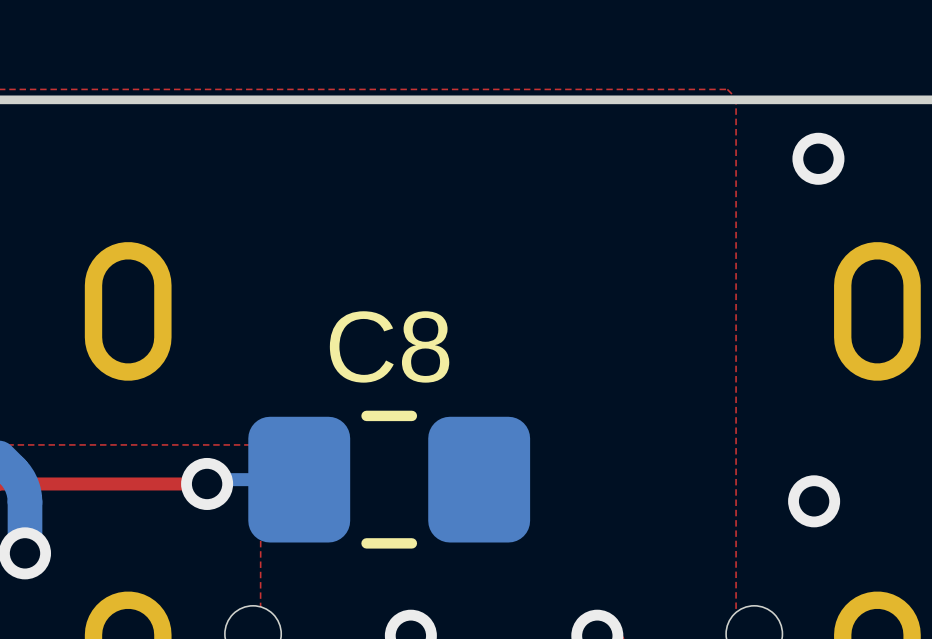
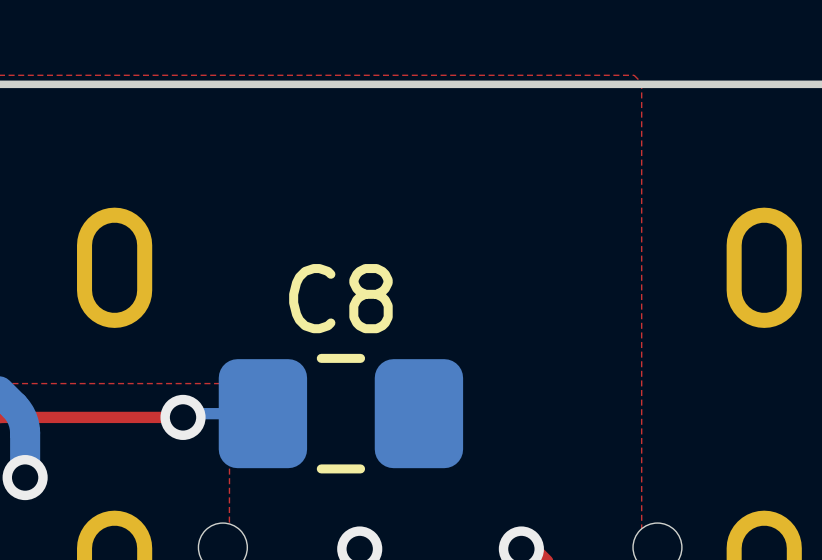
via: (818, 158) -> none
via: (814, 501) -> none

